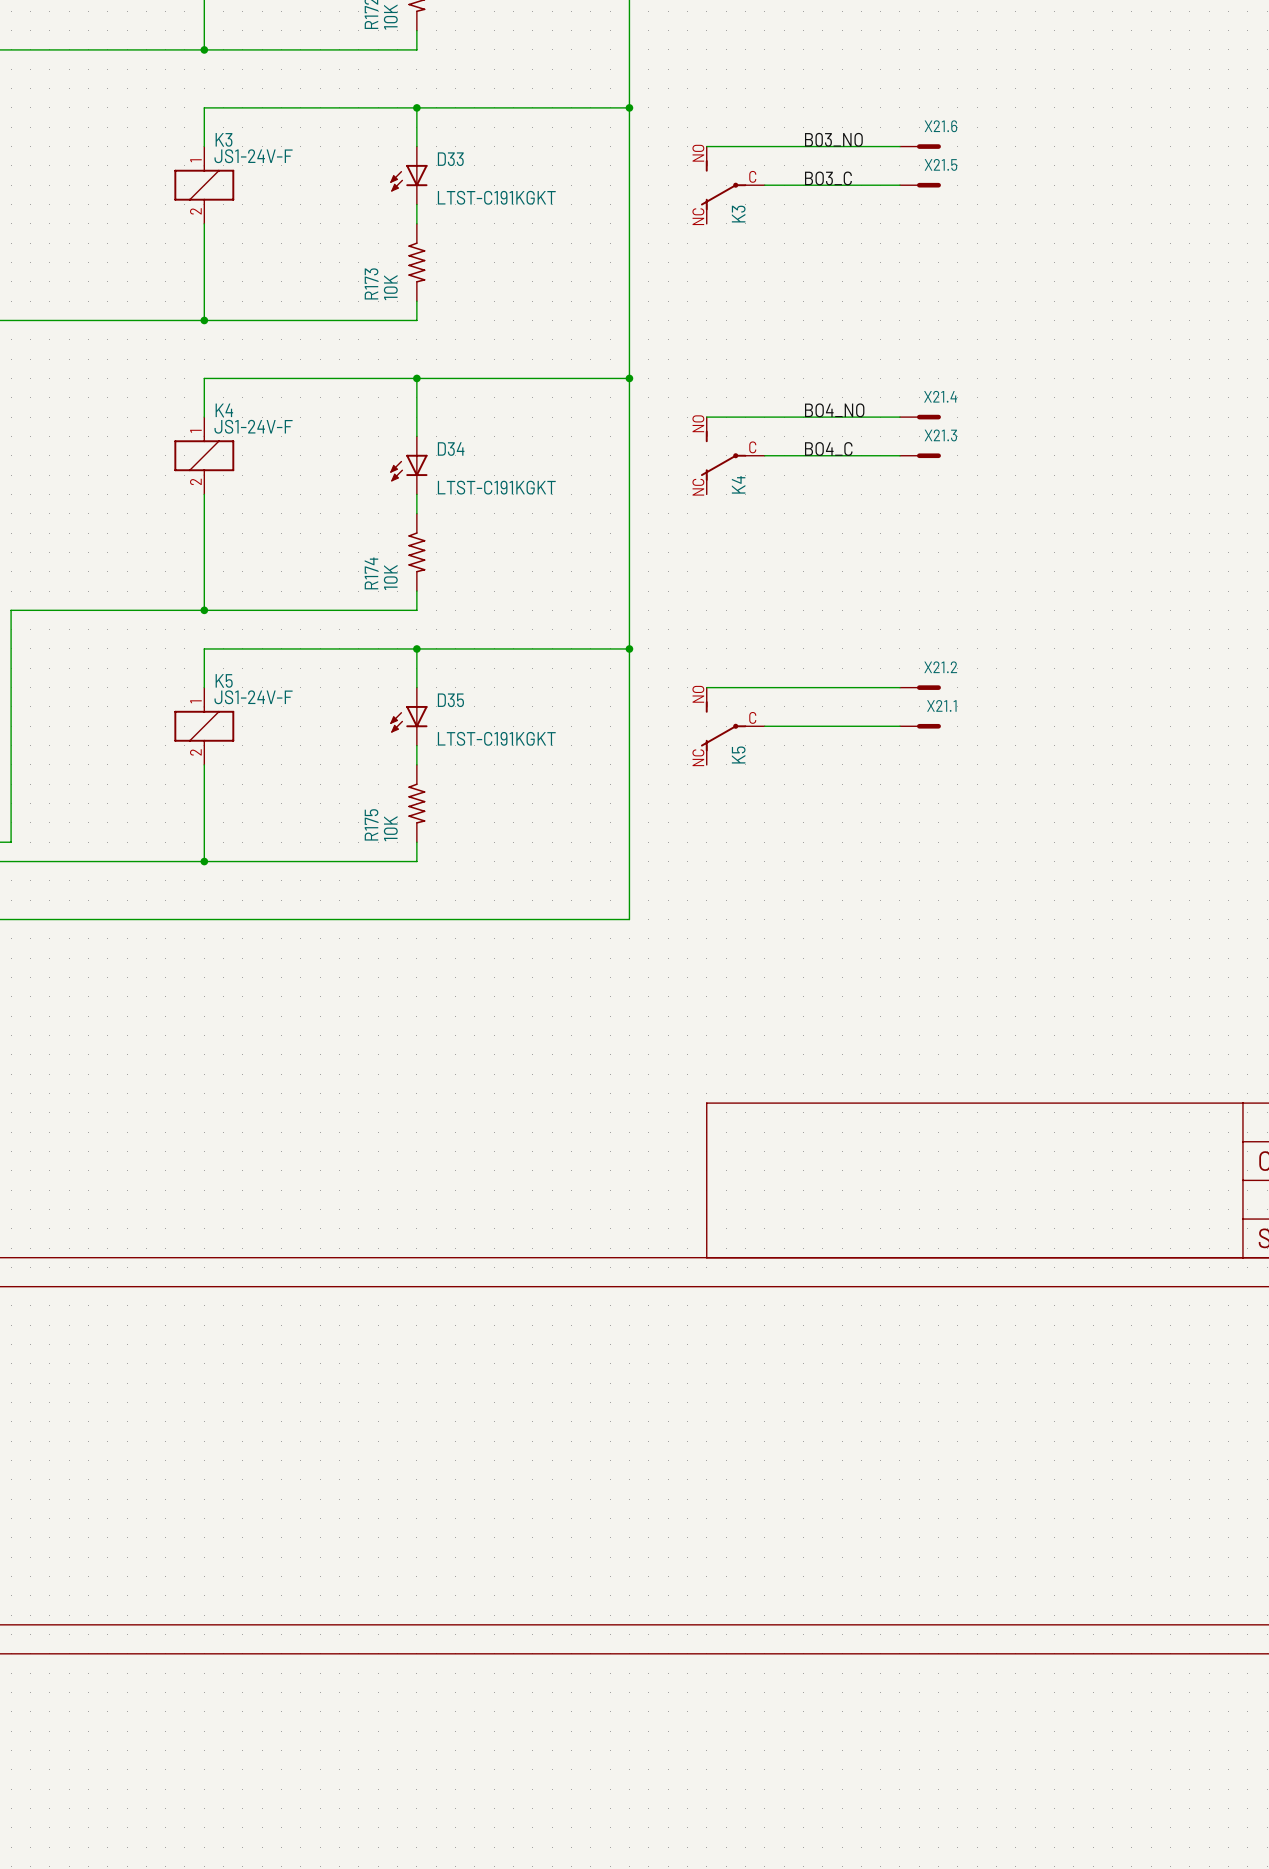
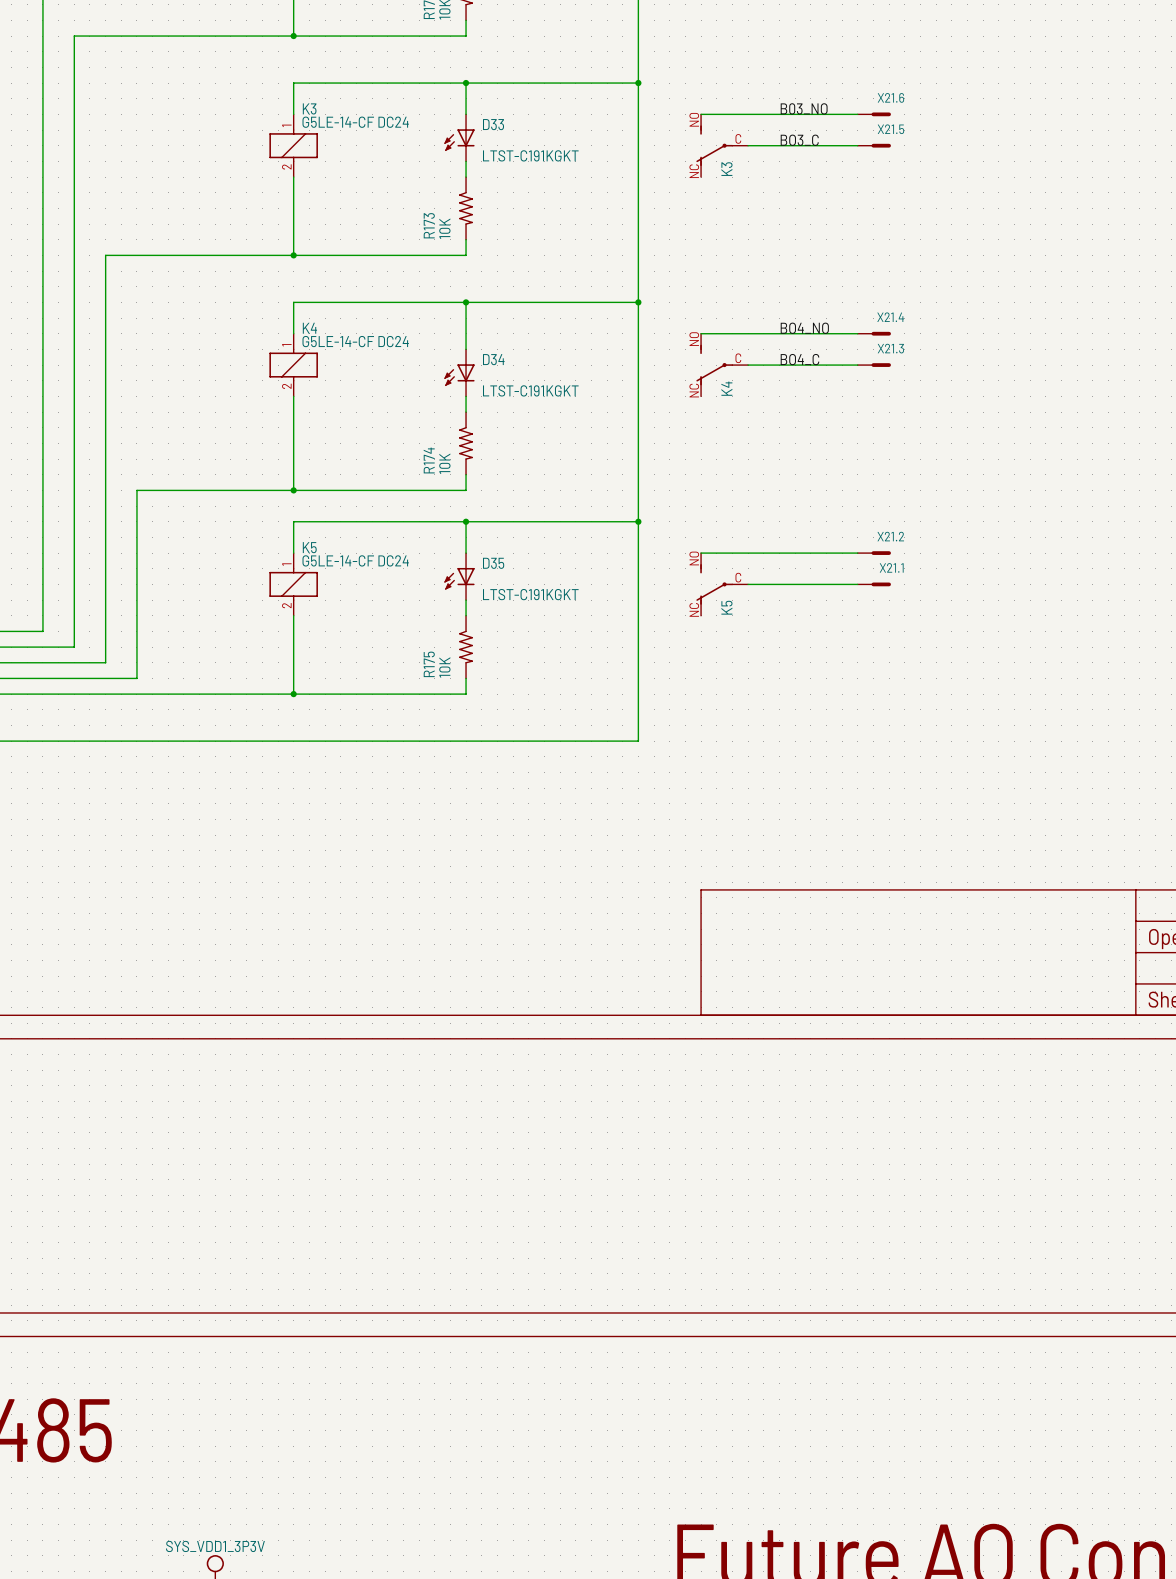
K3 value: JS1-24V-F (253, 156) -> G5LE-14-CF DC24 (355, 122)
K4 value: JS1-24V-F (253, 426) -> G5LE-14-CF DC24 (355, 341)
K5 value: JS1-24V-F (253, 697) -> G5LE-14-CF DC24 (355, 560)

